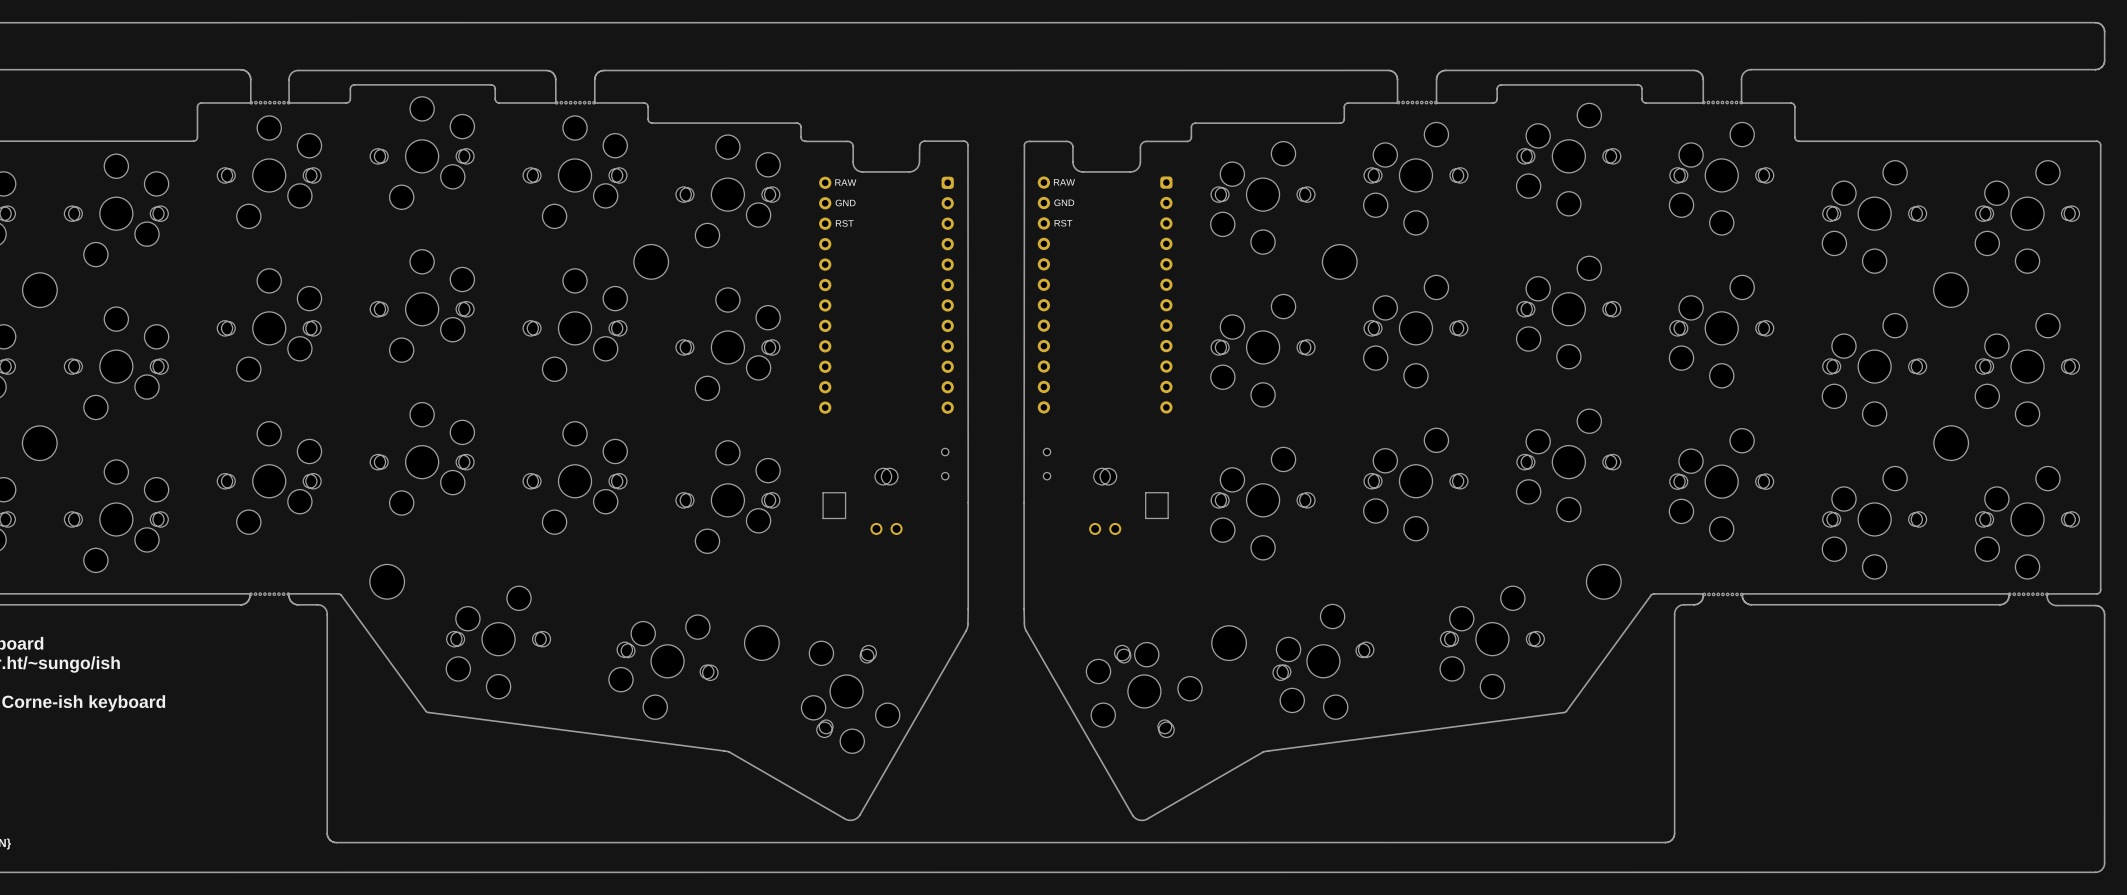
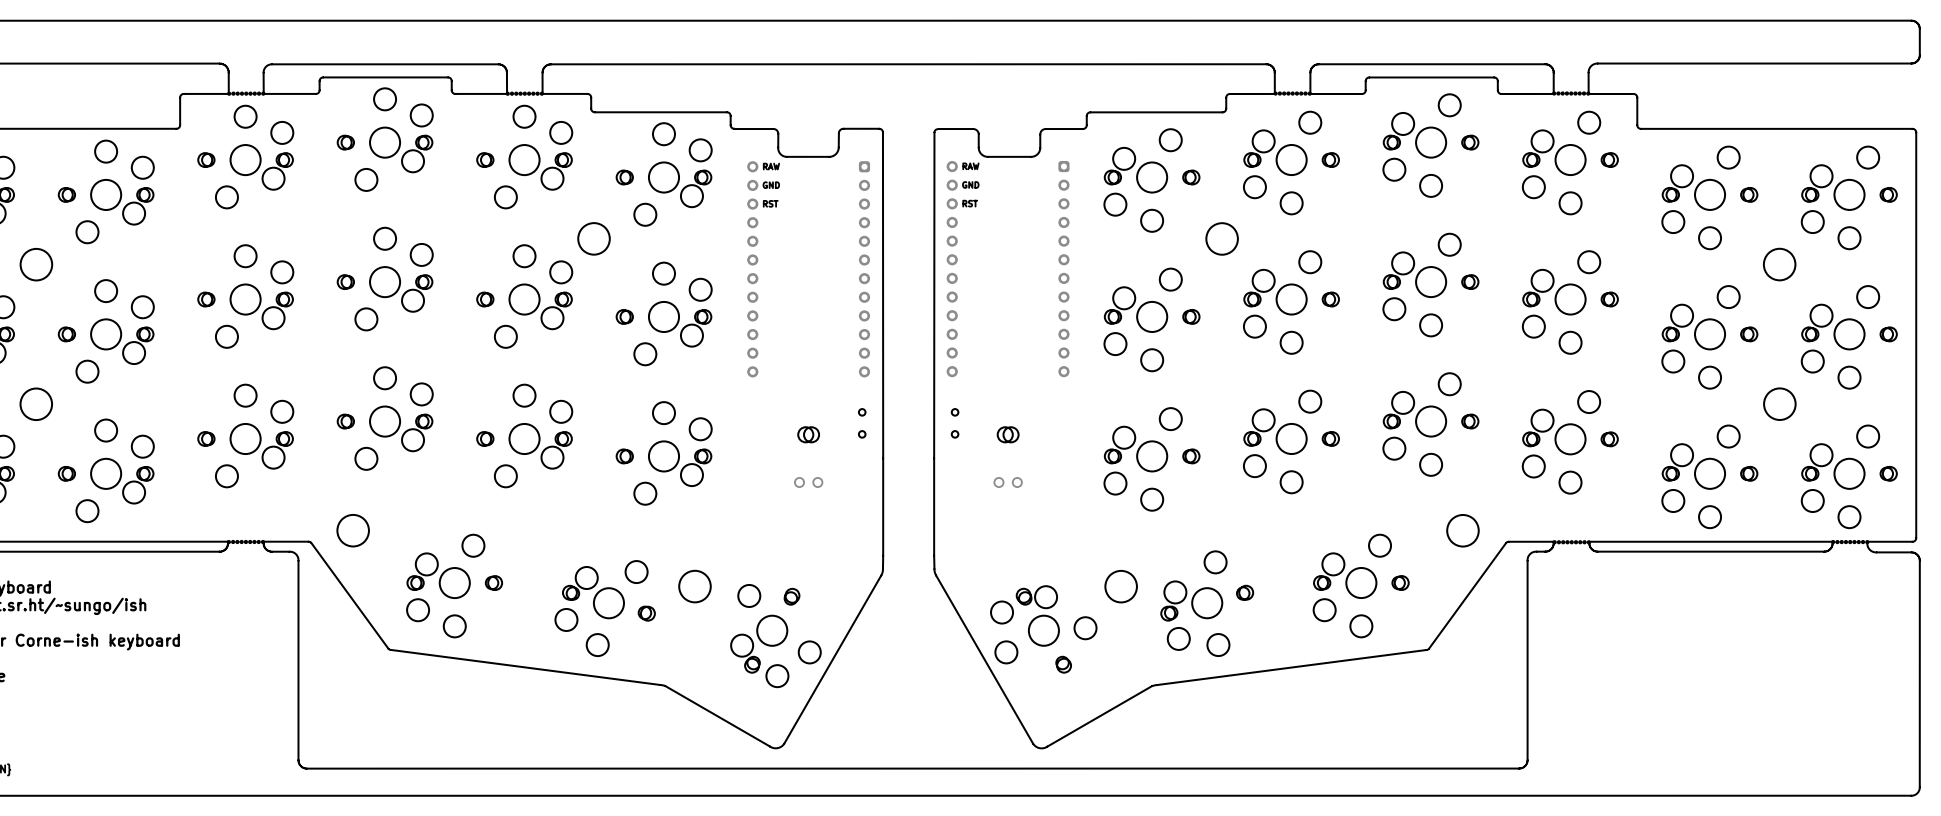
part: (834, 505) -> none
part: (1156, 505) -> none

